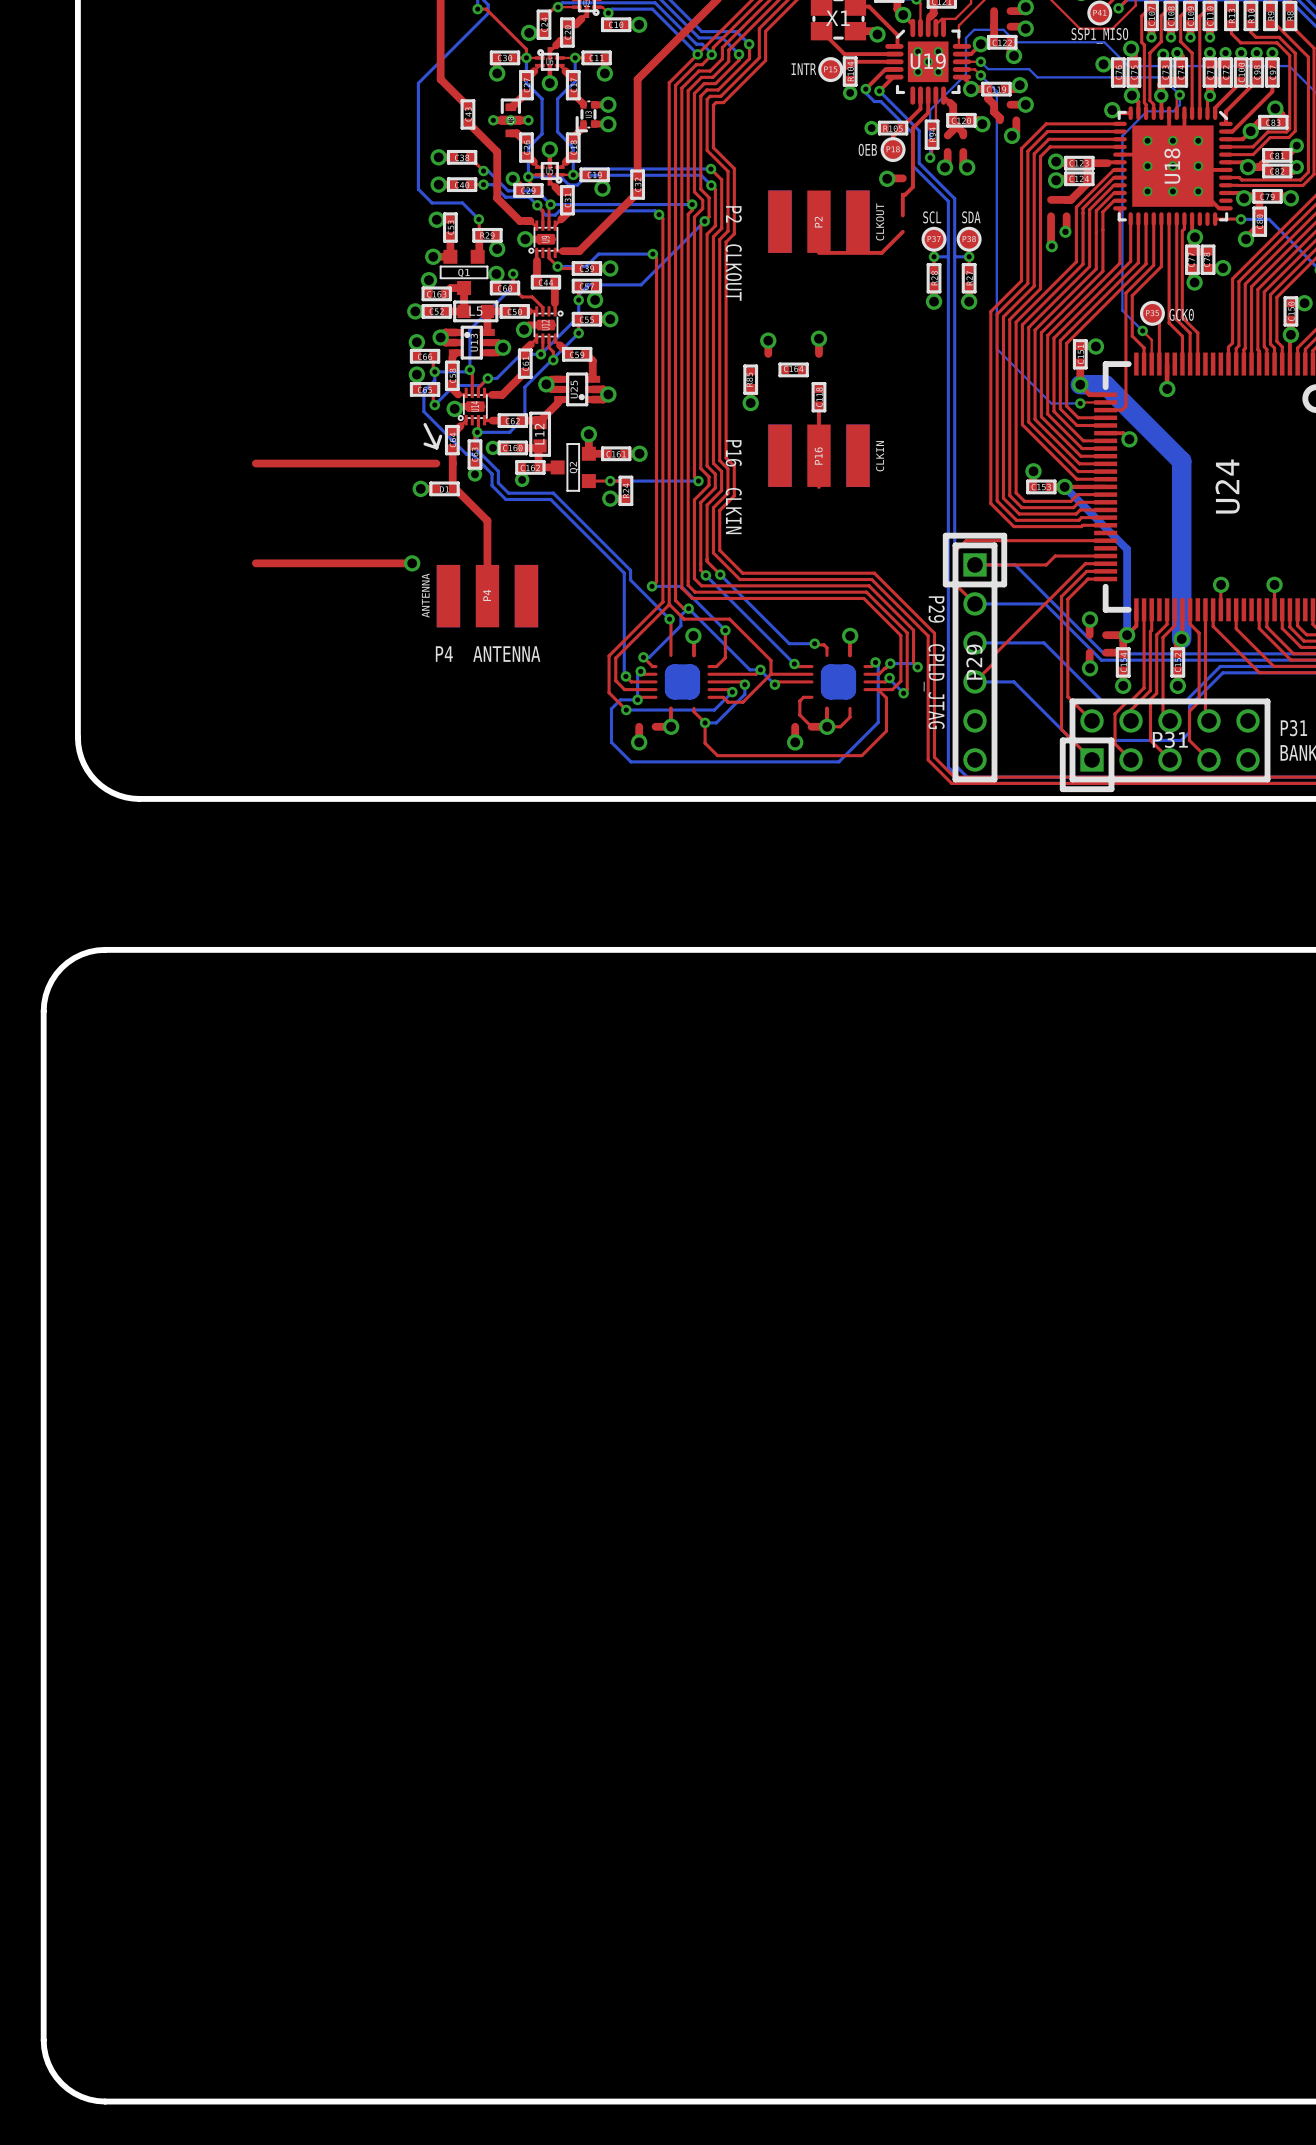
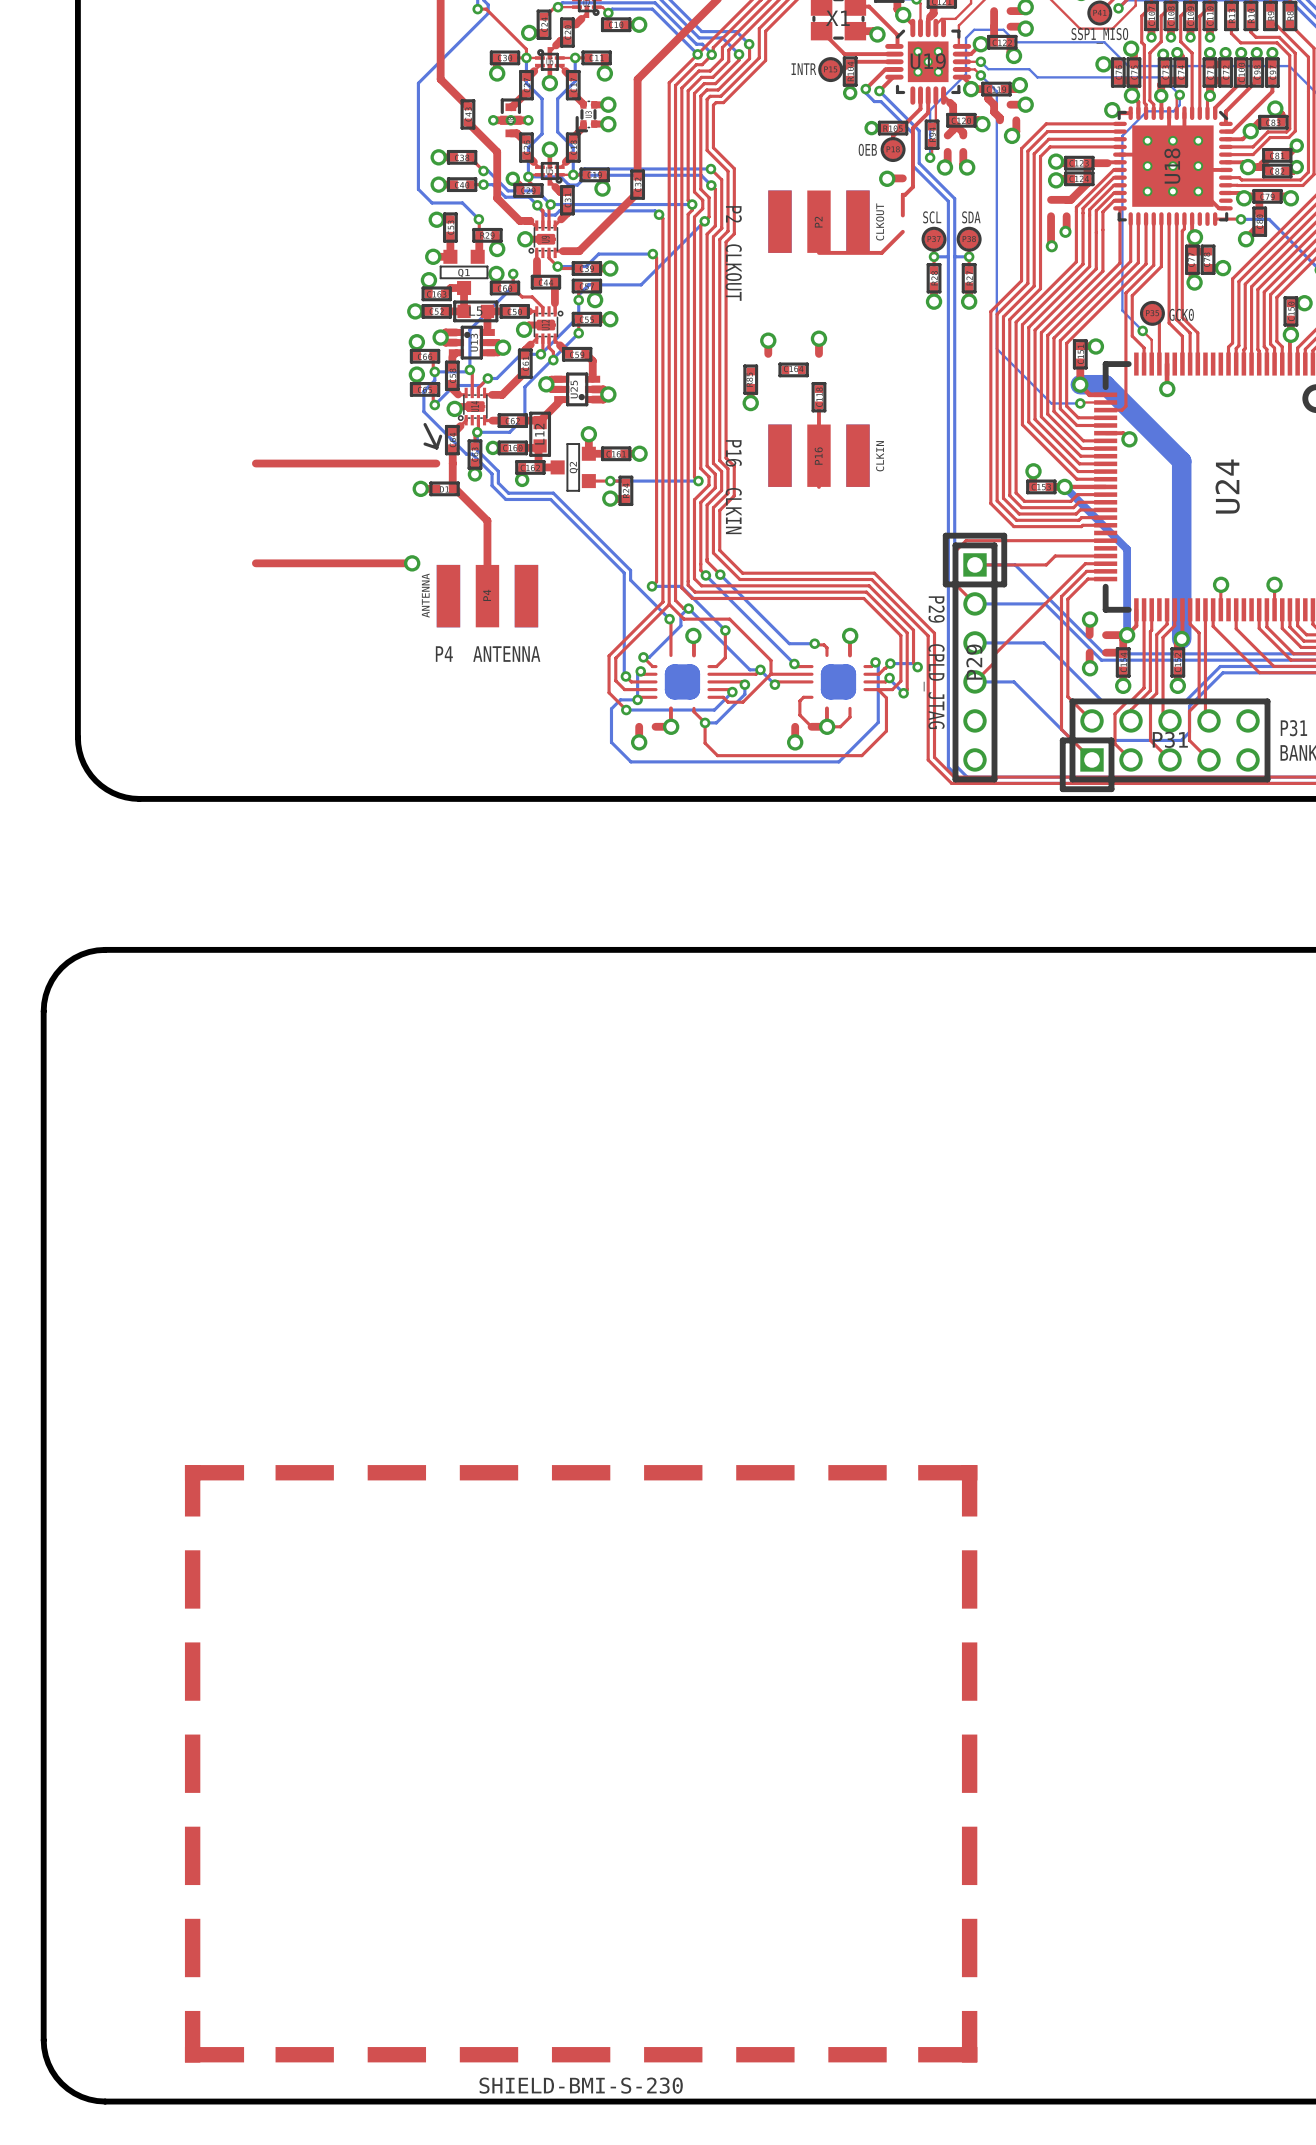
SHIELD-BMI-S-230: none -> (581, 1763)

